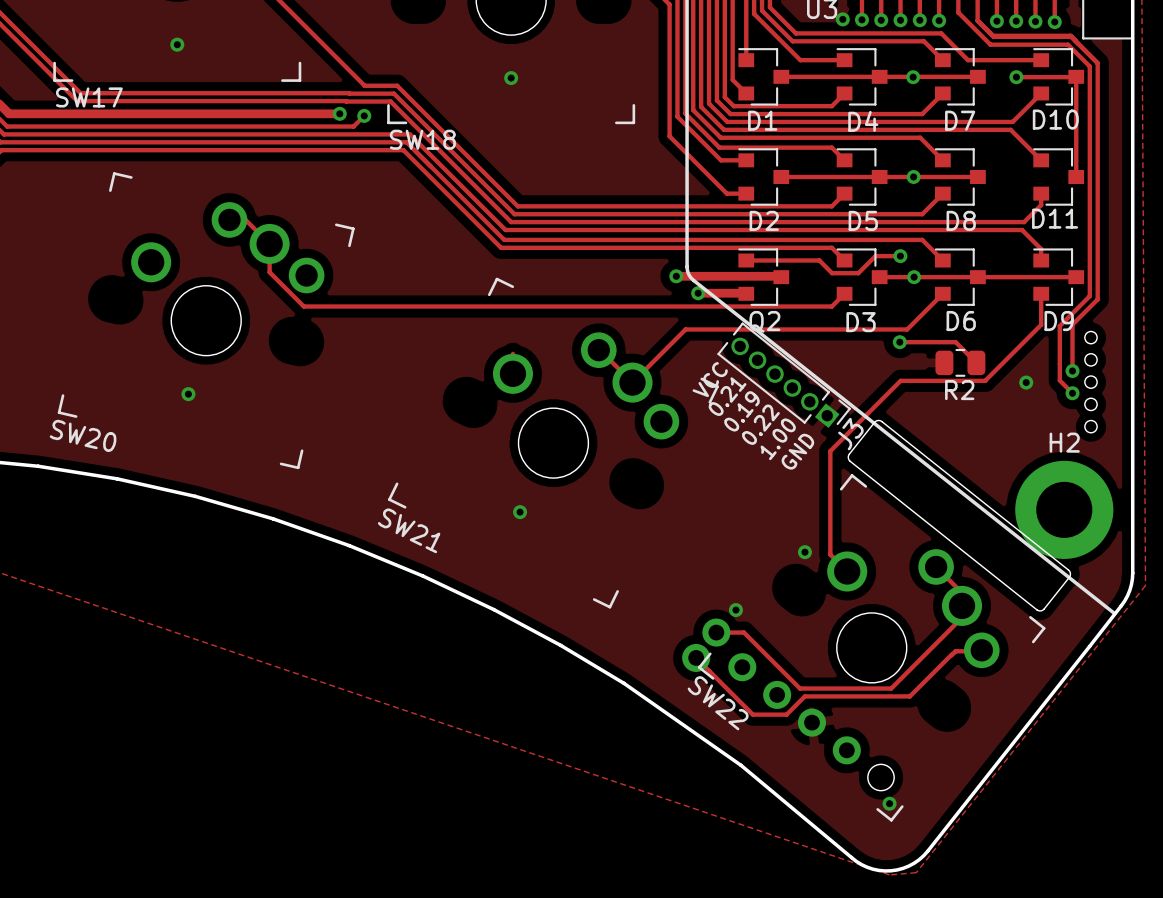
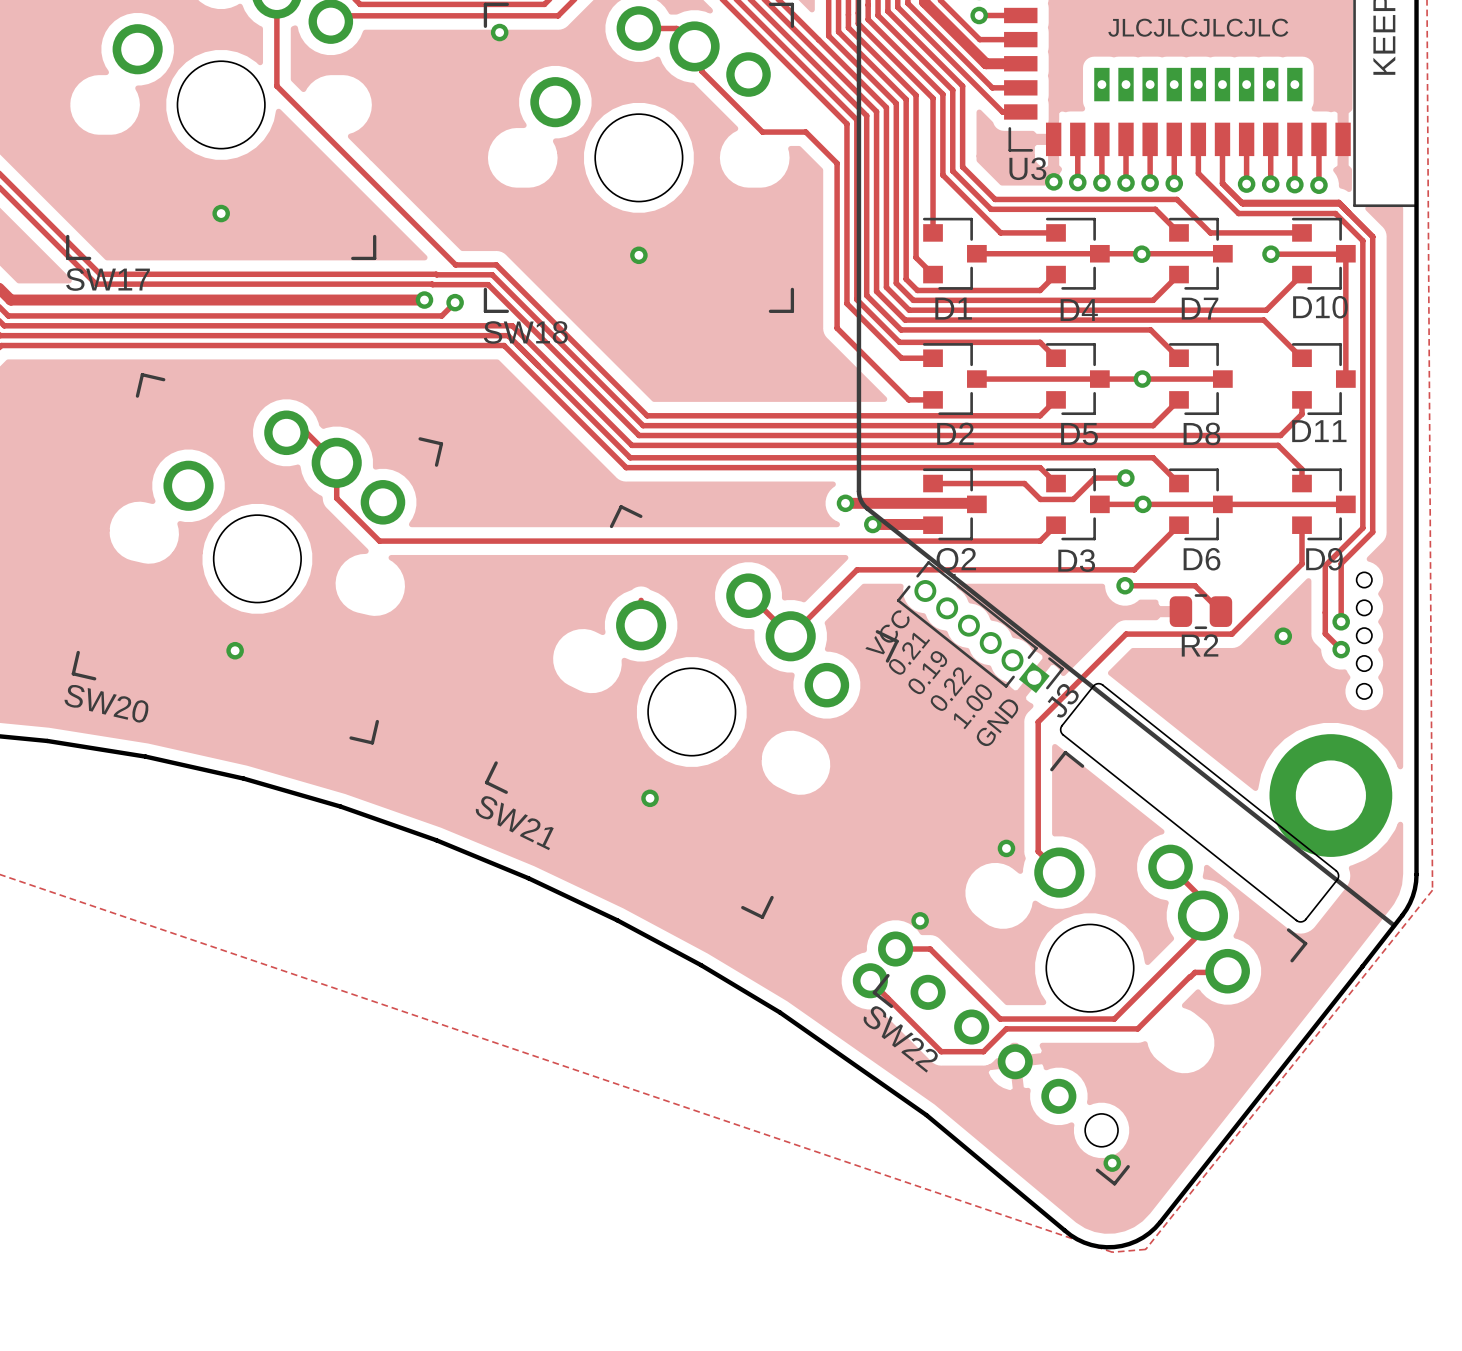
H2 name: H2 (1064, 442) -> none

